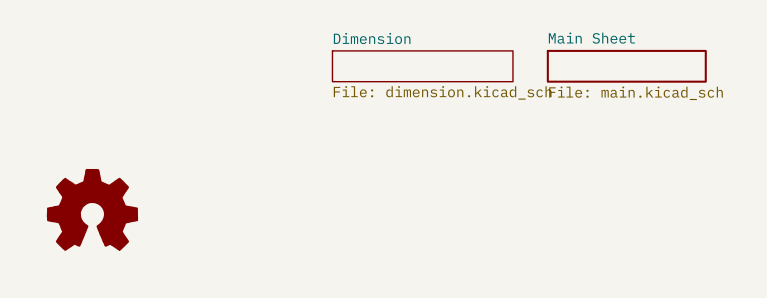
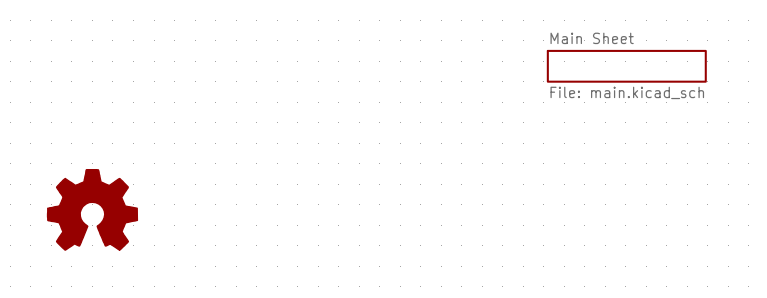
sheet Dimension: File: dimension.kicad_sch (422, 66) -> none

